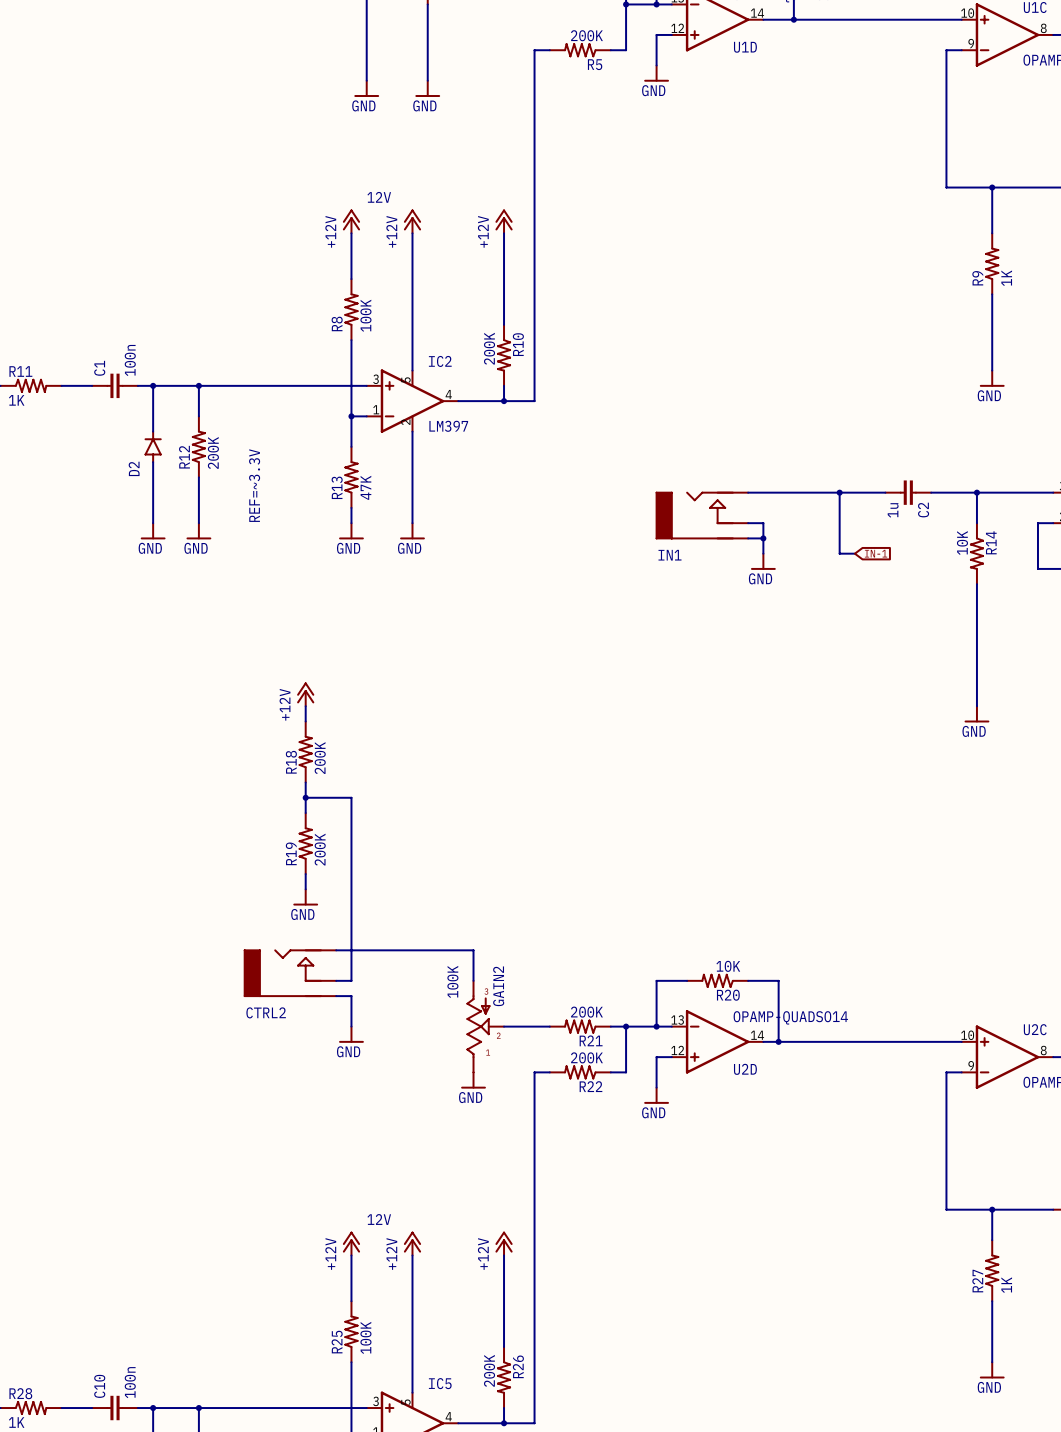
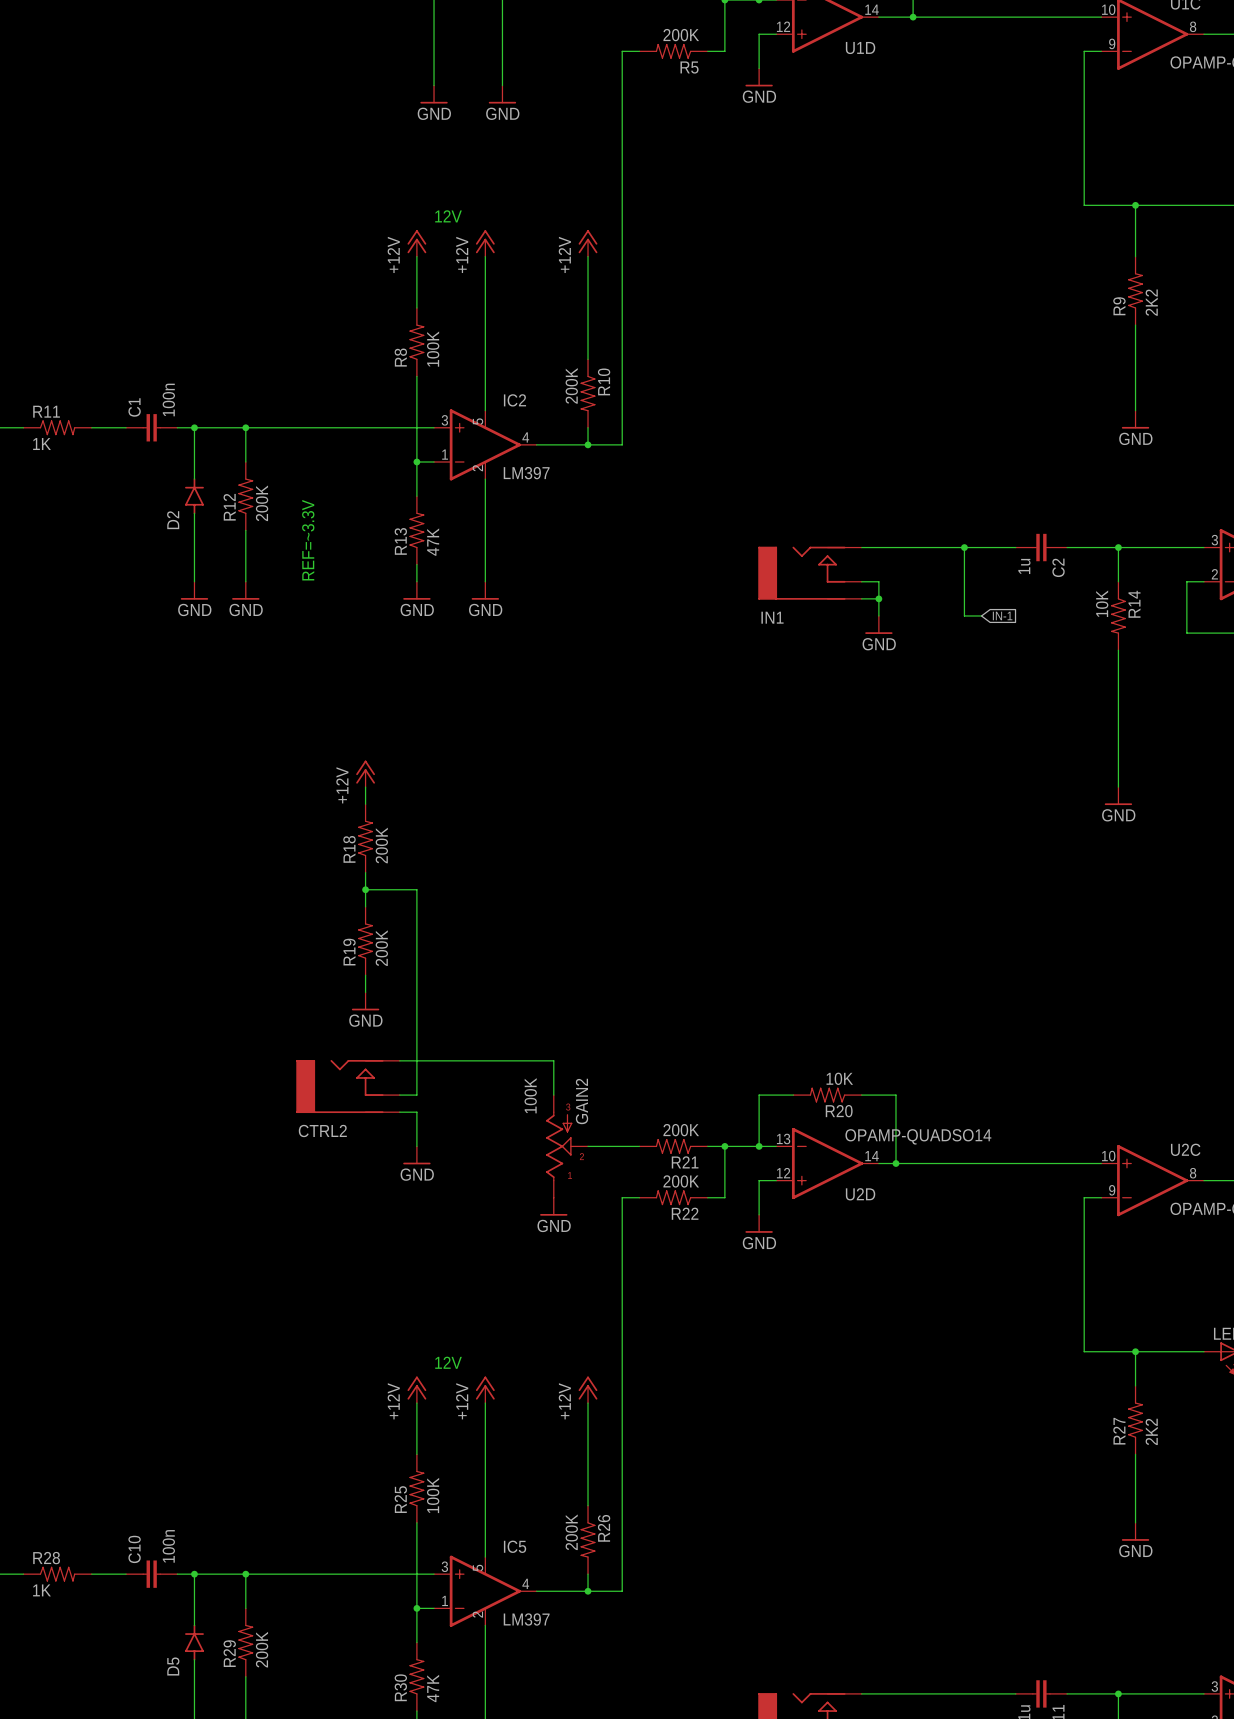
R9 value: 1K (1006, 278) -> 2K2 (1151, 302)
R27 value: 1K (1006, 1285) -> 2K2 (1151, 1431)

